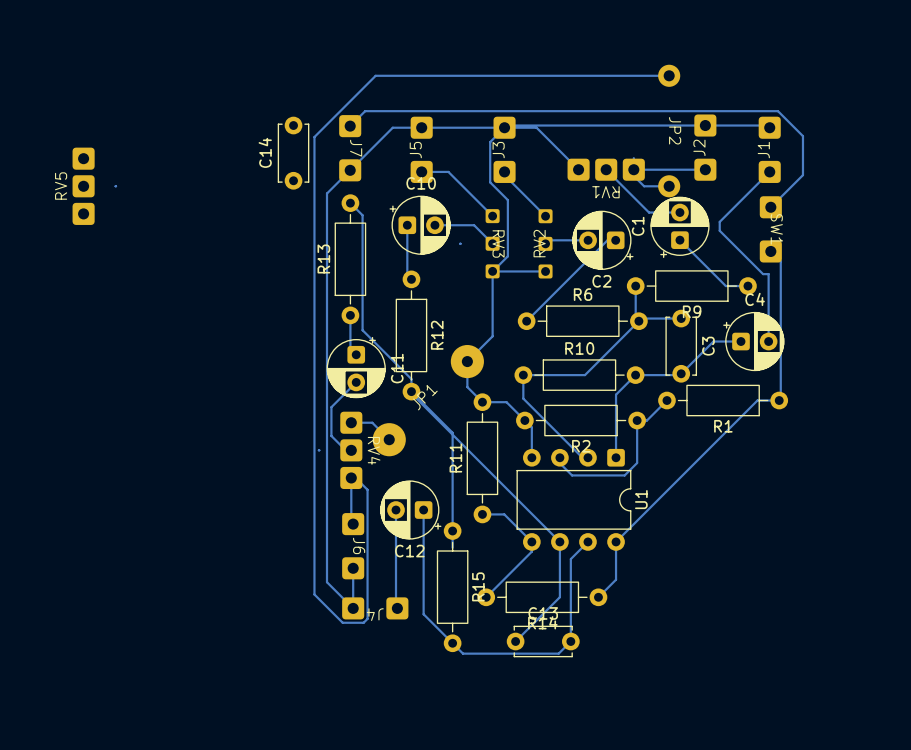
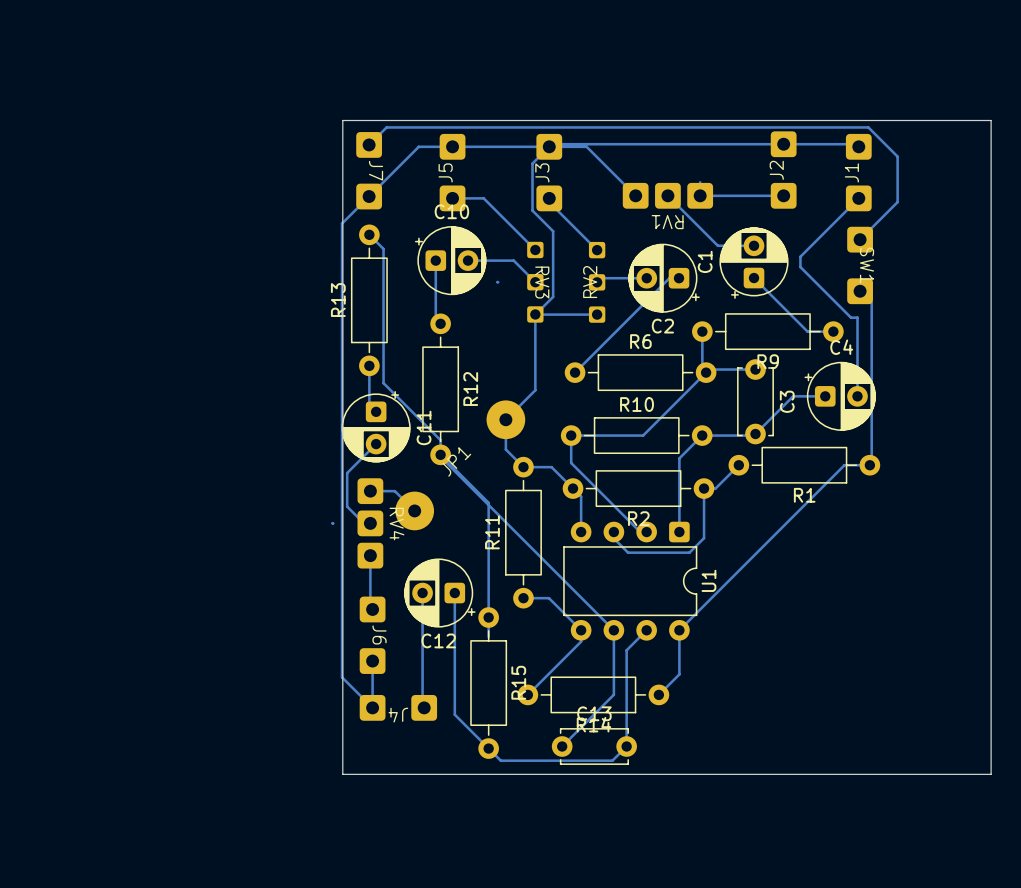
bottom track: (669, 75) (375, 75) (314, 137) (314, 594) (342, 622) (363, 622) (367, 618) (367, 489) (355, 477) -> none
board edge: none -> (342, 120) (991, 120) (991, 774) (342, 774) (342, 120)
JP2: (669, 131) -> none
C14: (293, 153) -> none
bottom track: (633, 174) (644, 186) (669, 186) -> none
RV5: (83, 186) -> none

